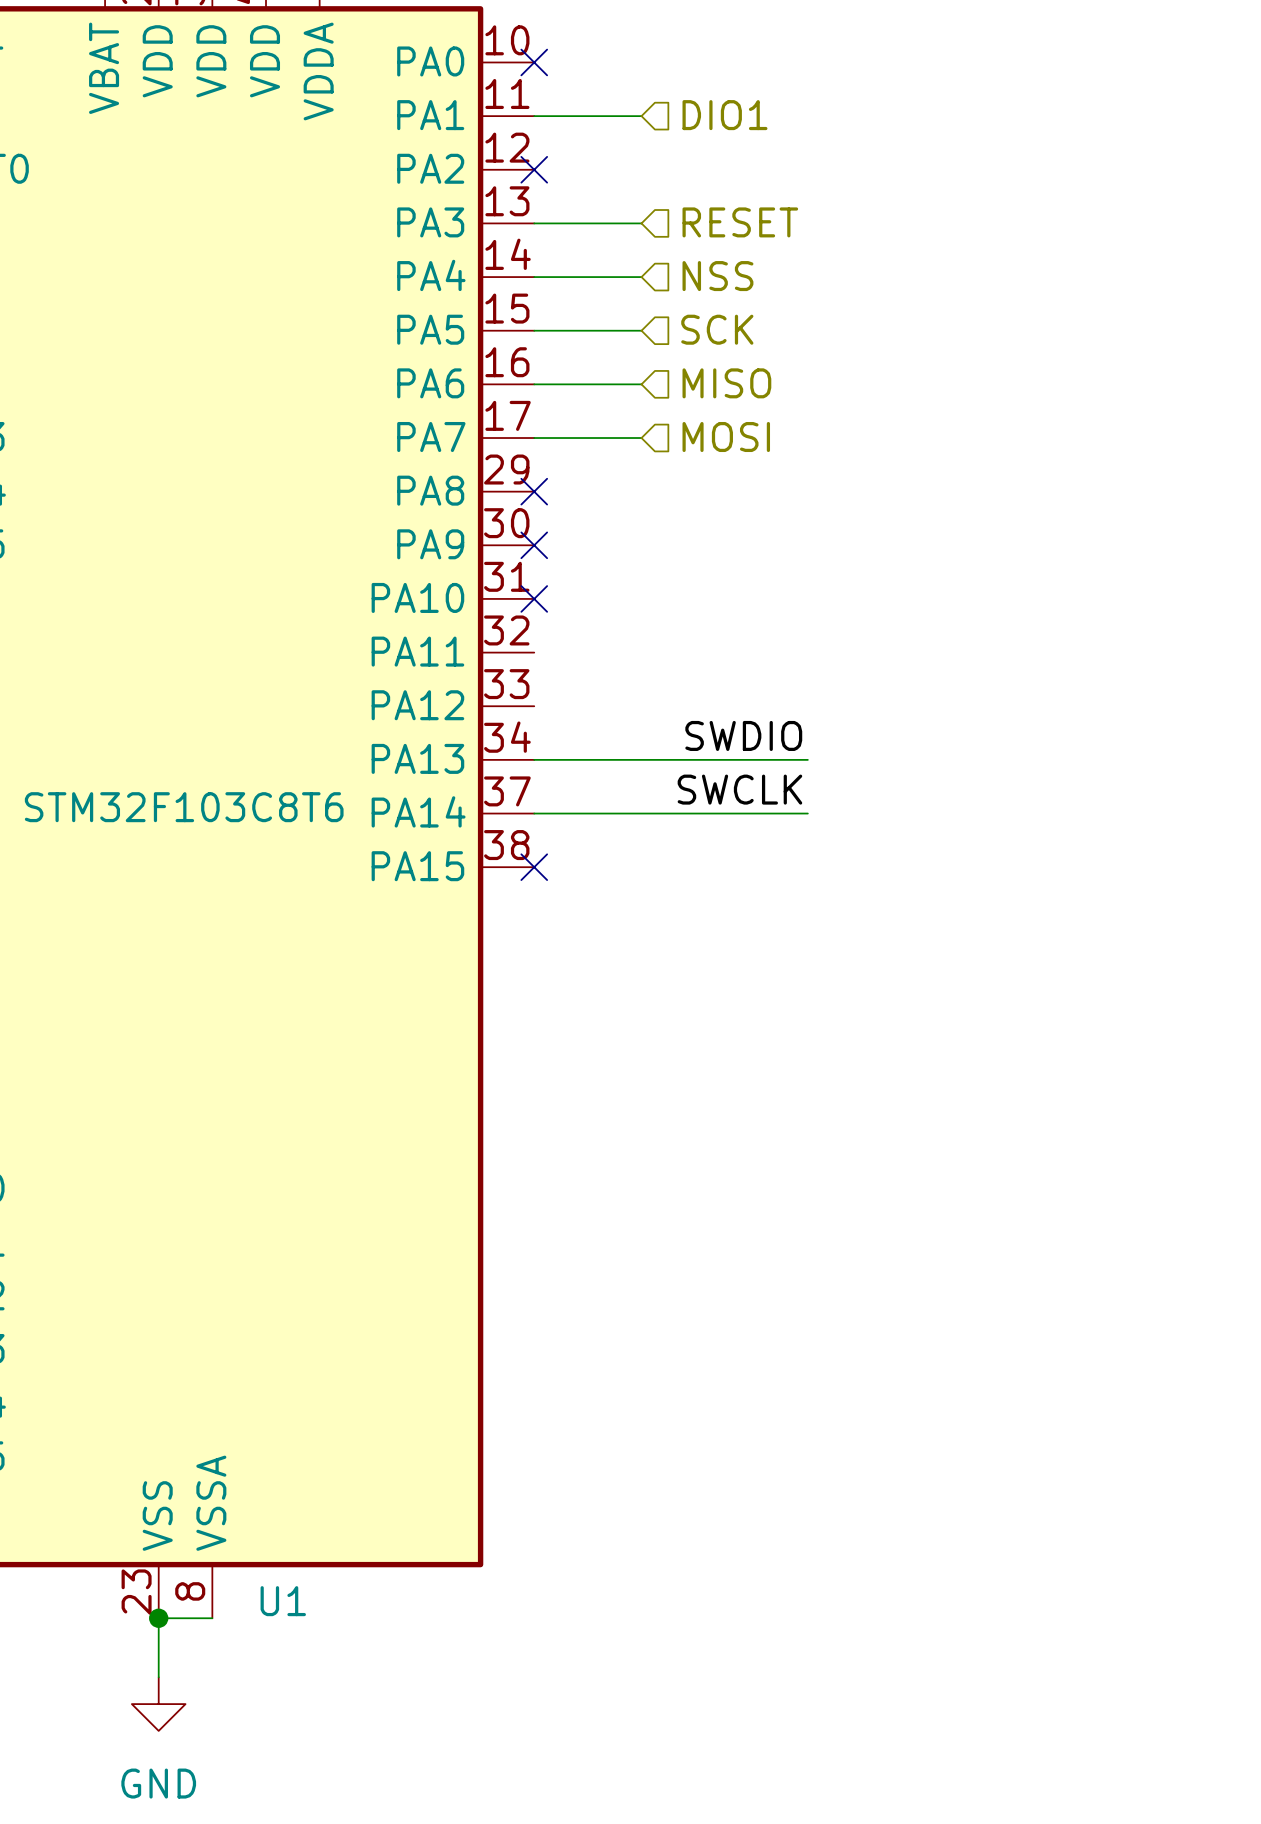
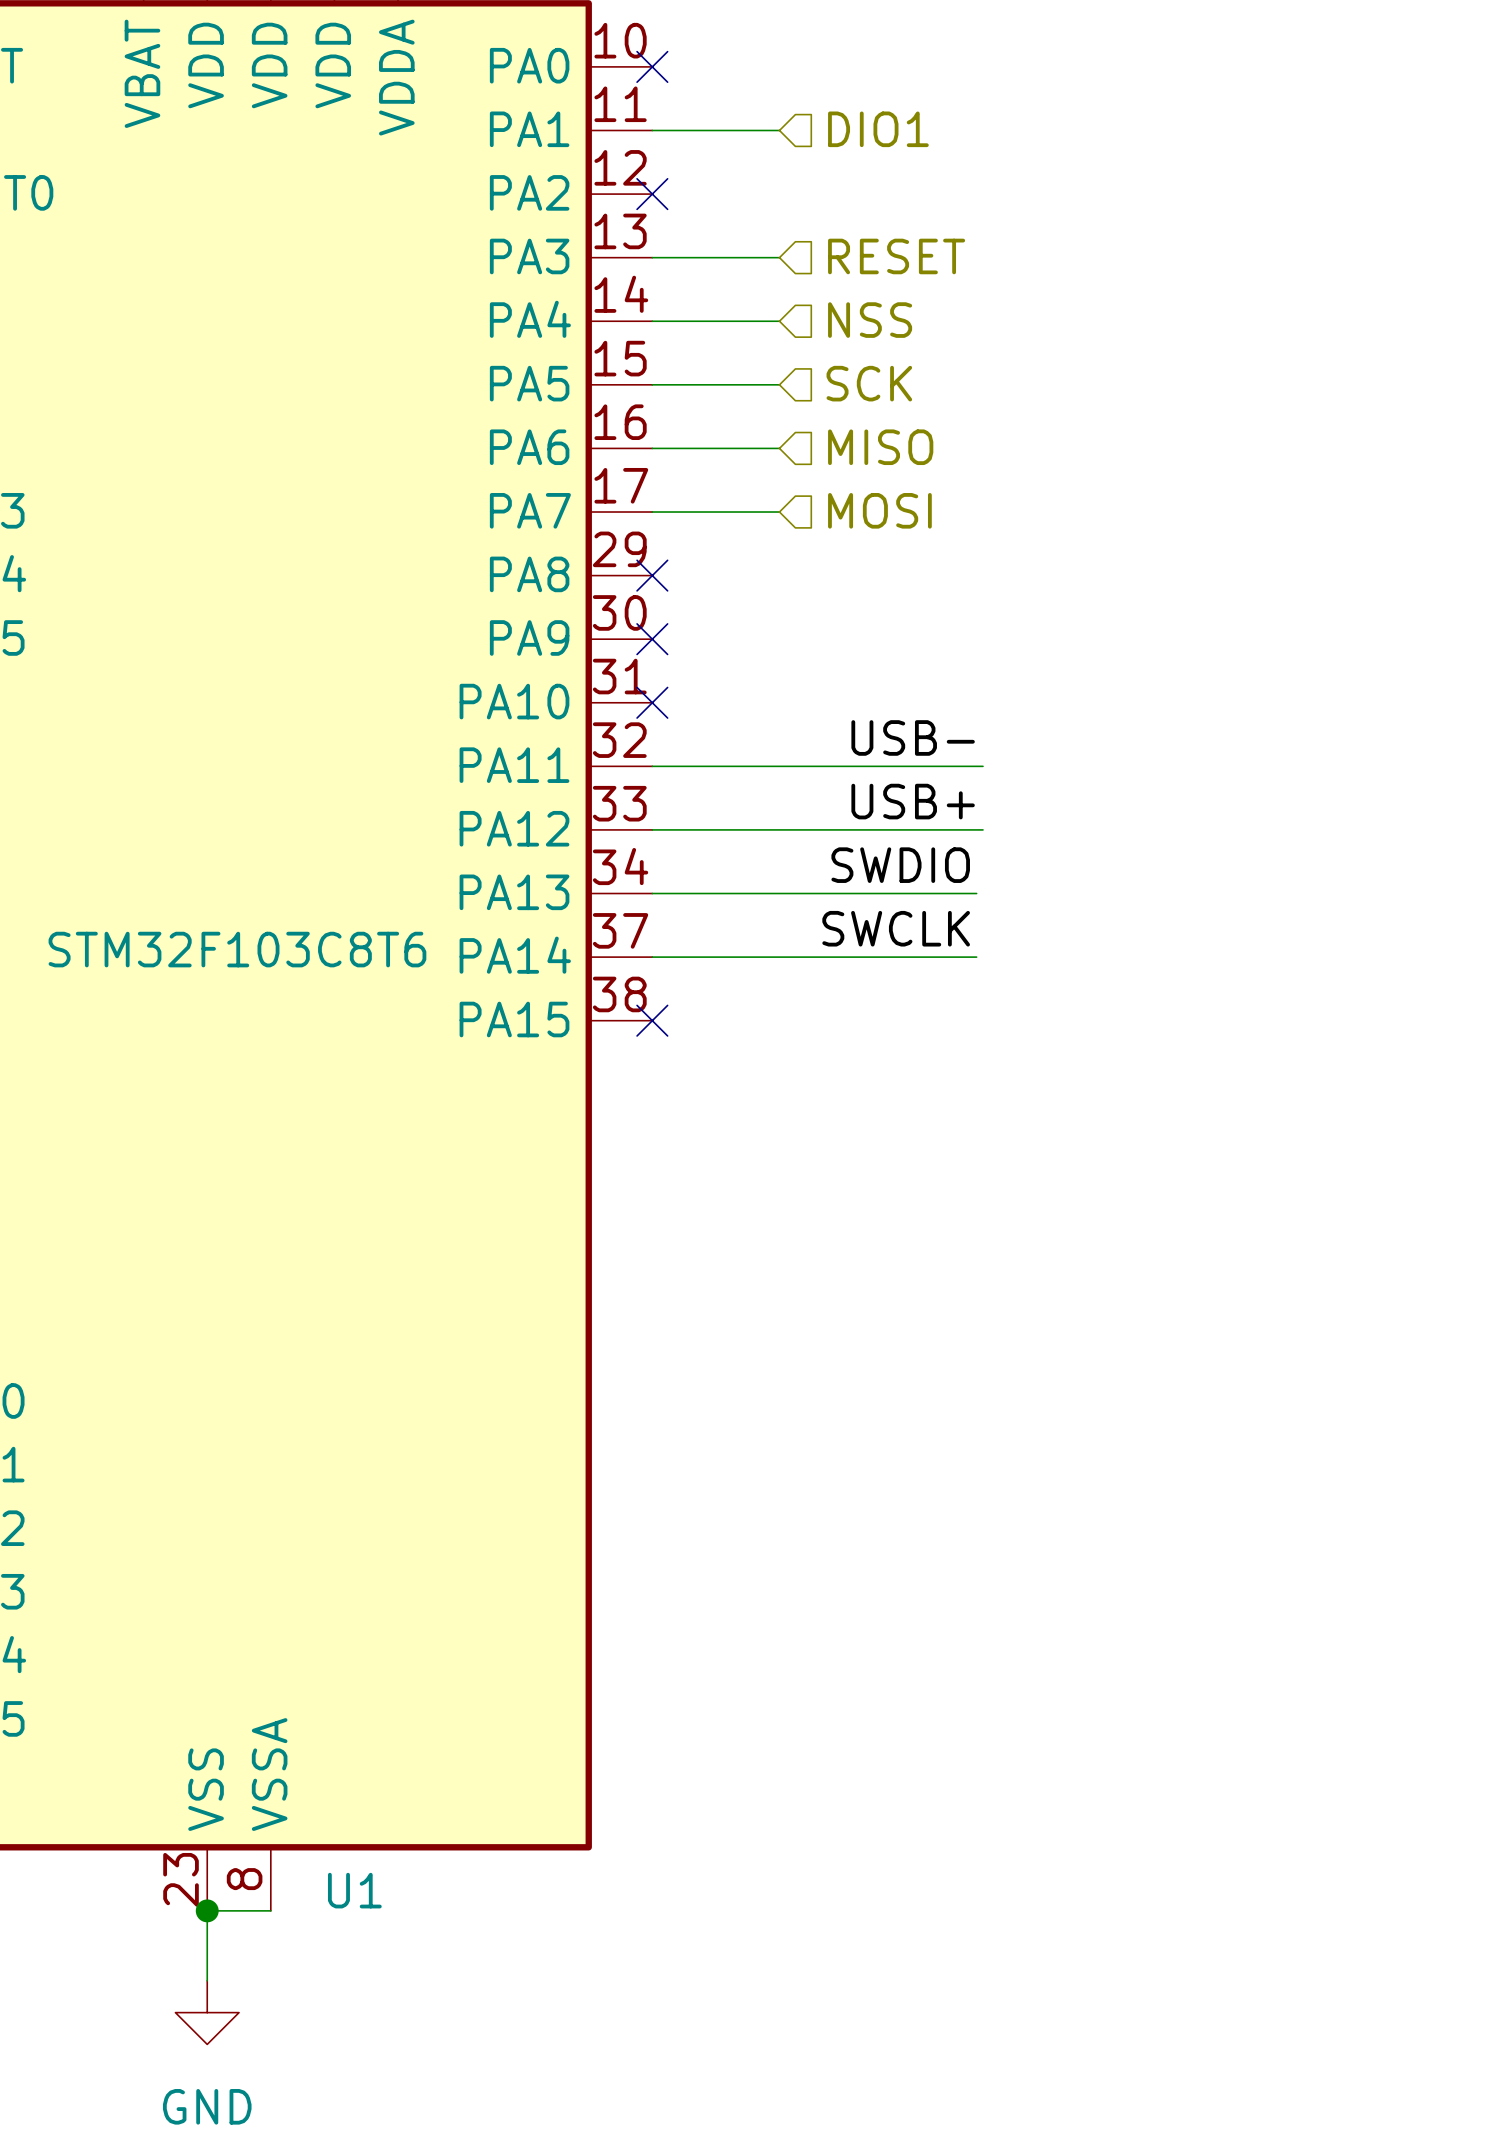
label: none -> USB- (913, 737)
wire: none -> (652, 766) (982, 766)
label: none -> USB+ (913, 801)
wire: none -> (652, 829) (982, 829)

